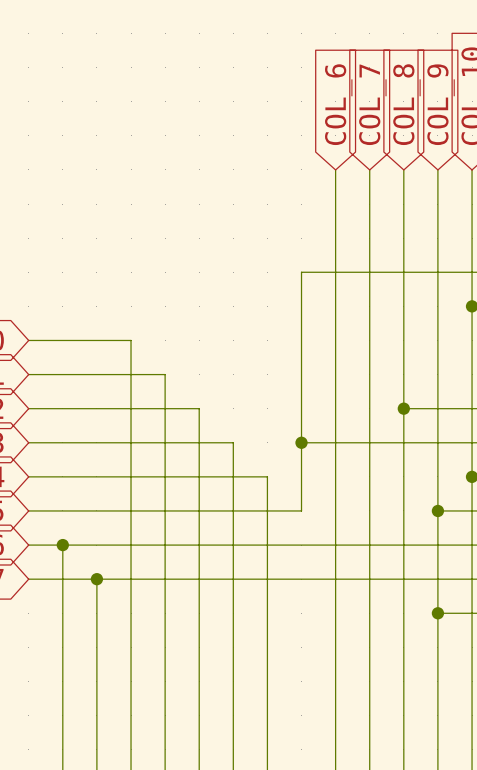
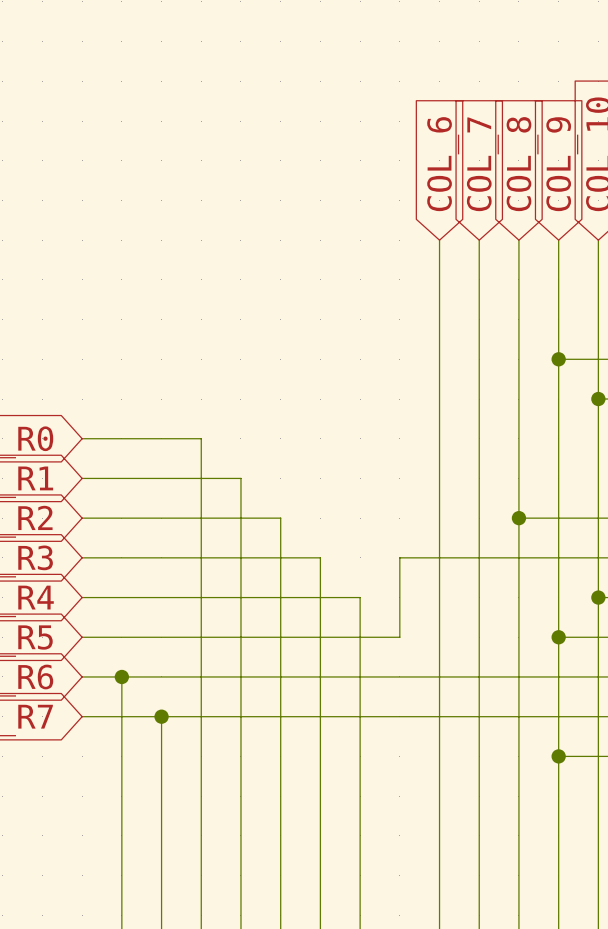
wire: (437, 272) (301, 272) (301, 442) -> none
junction: none -> (558, 359)
junction: (301, 442) -> none

